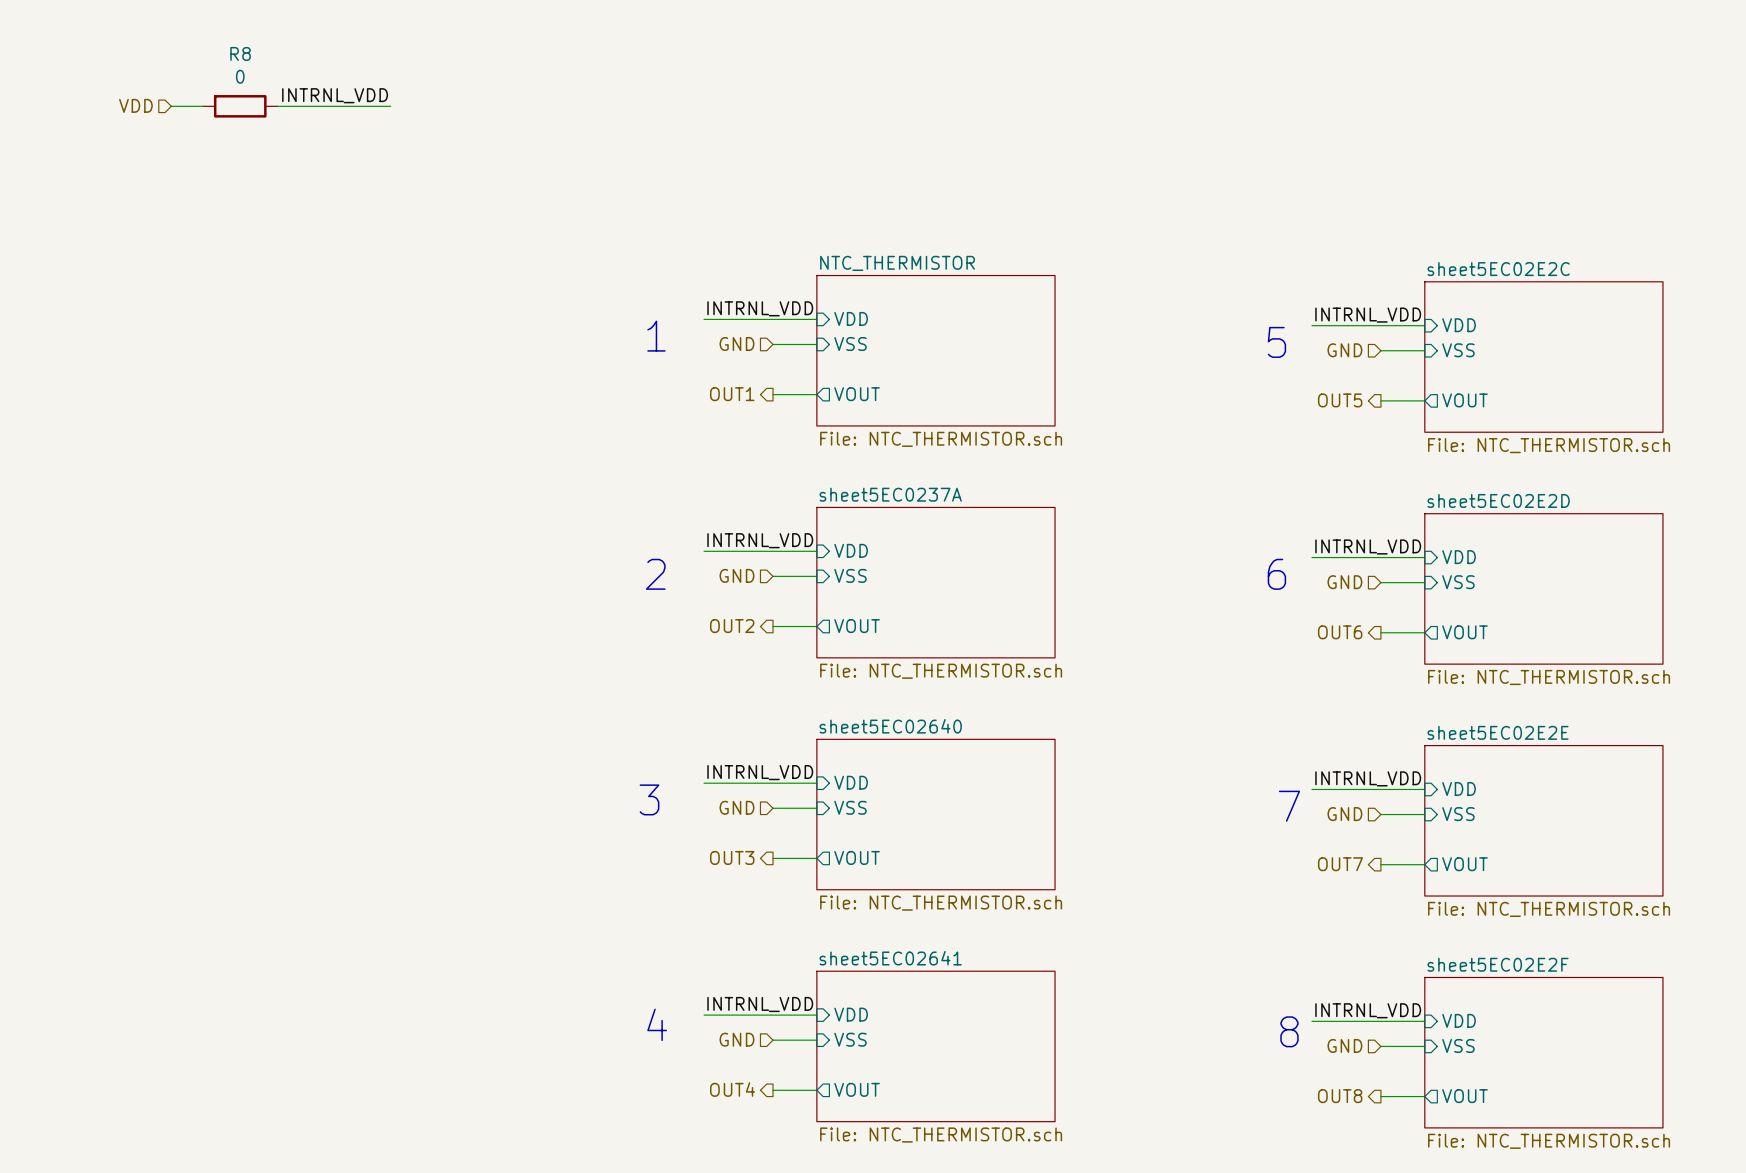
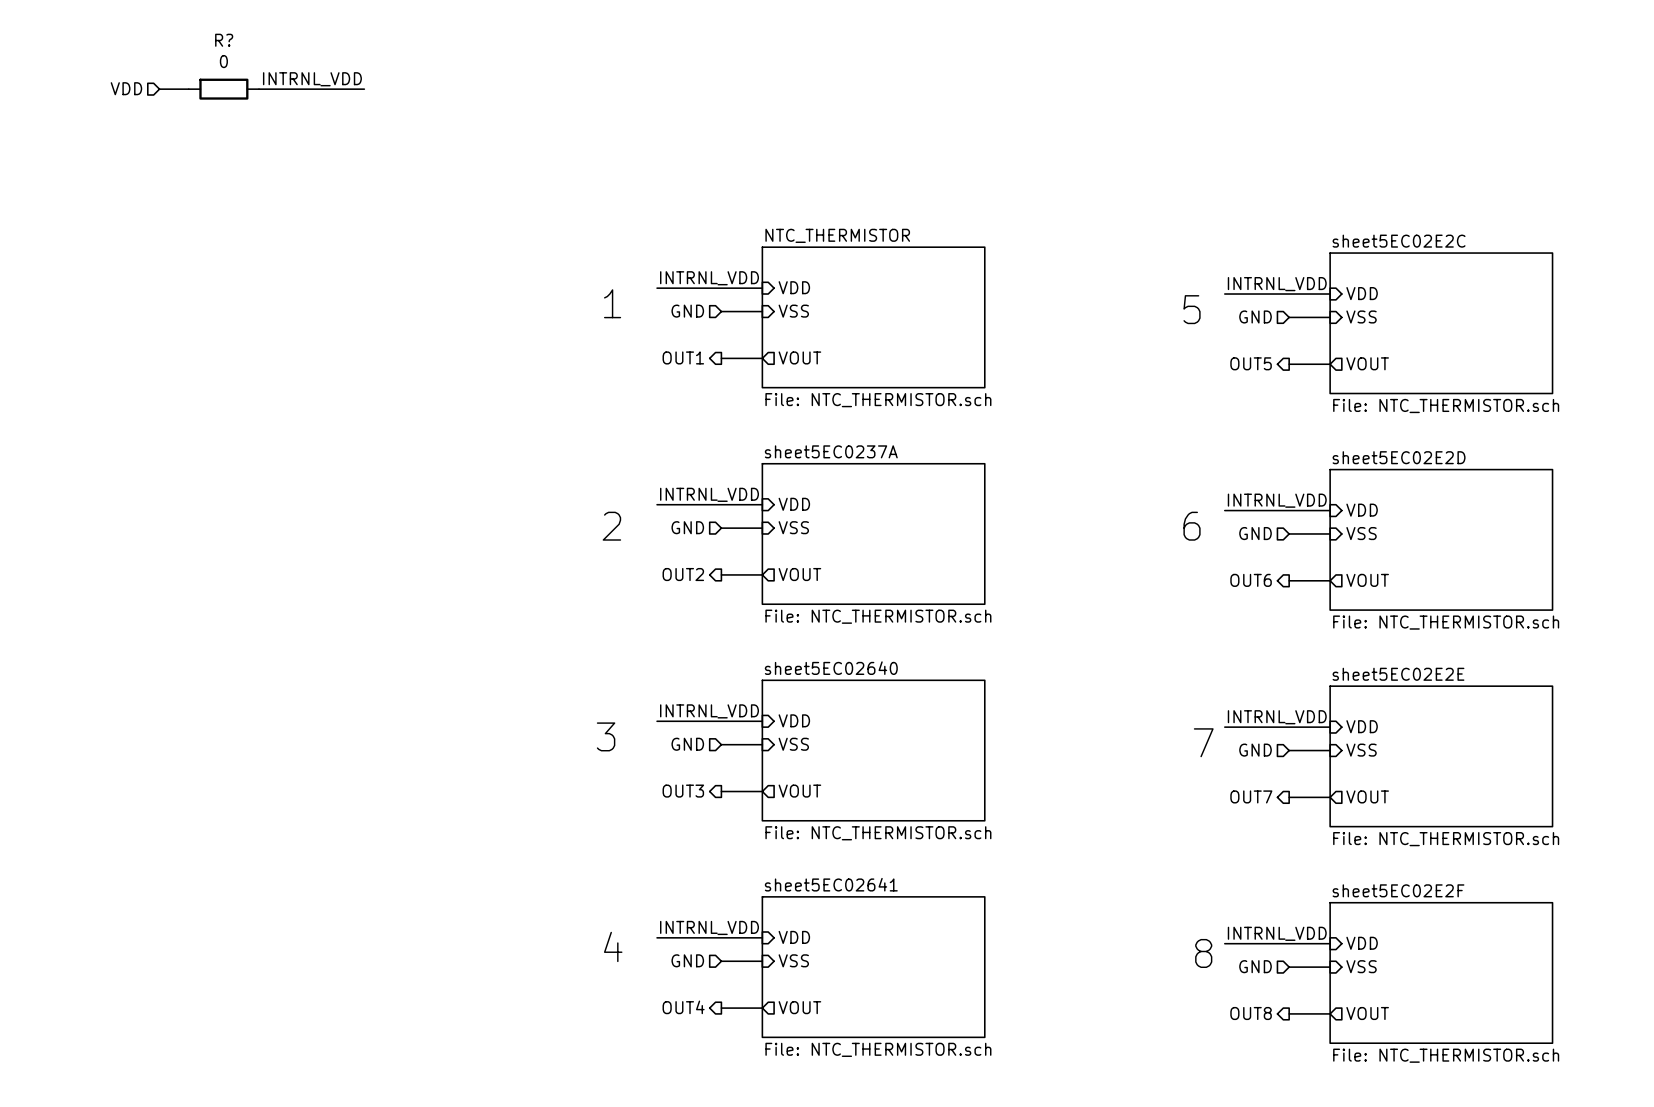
R8 name: R8 (240, 53) -> R? (224, 40)

